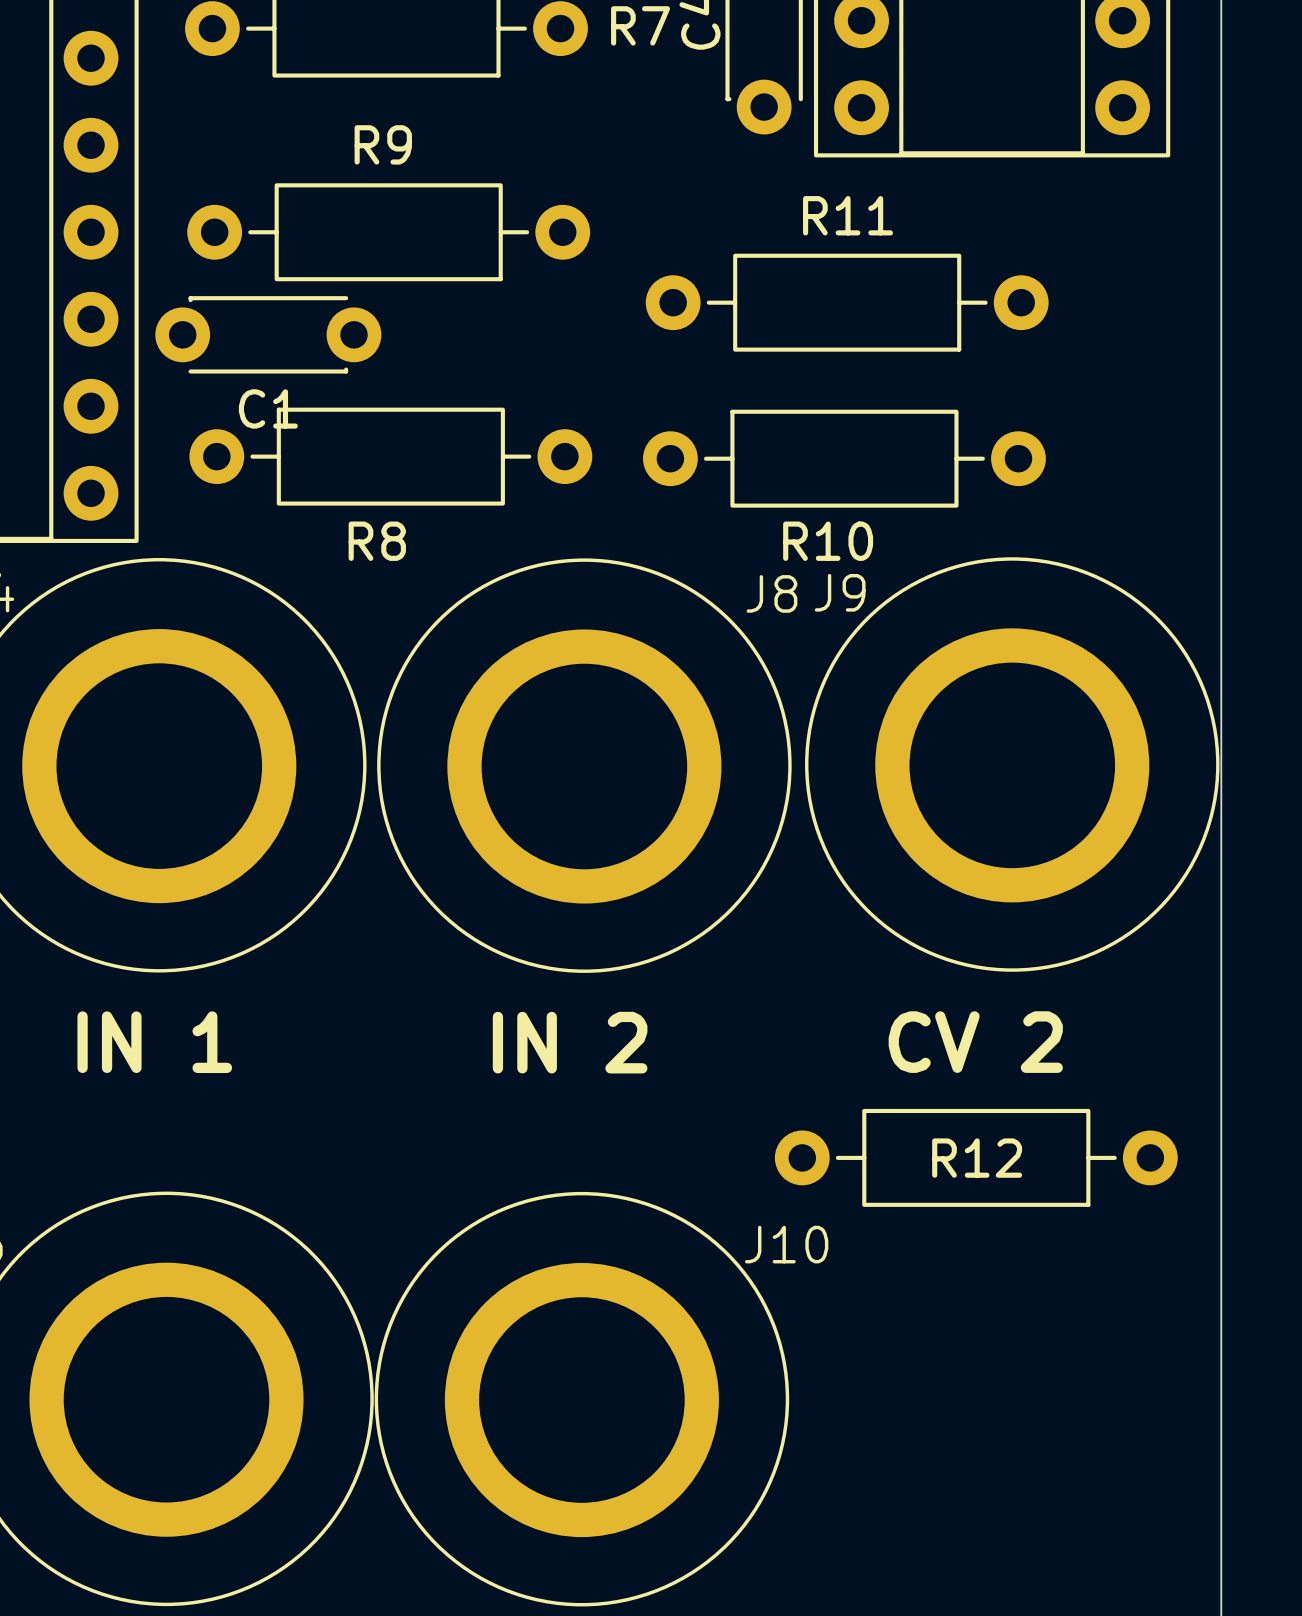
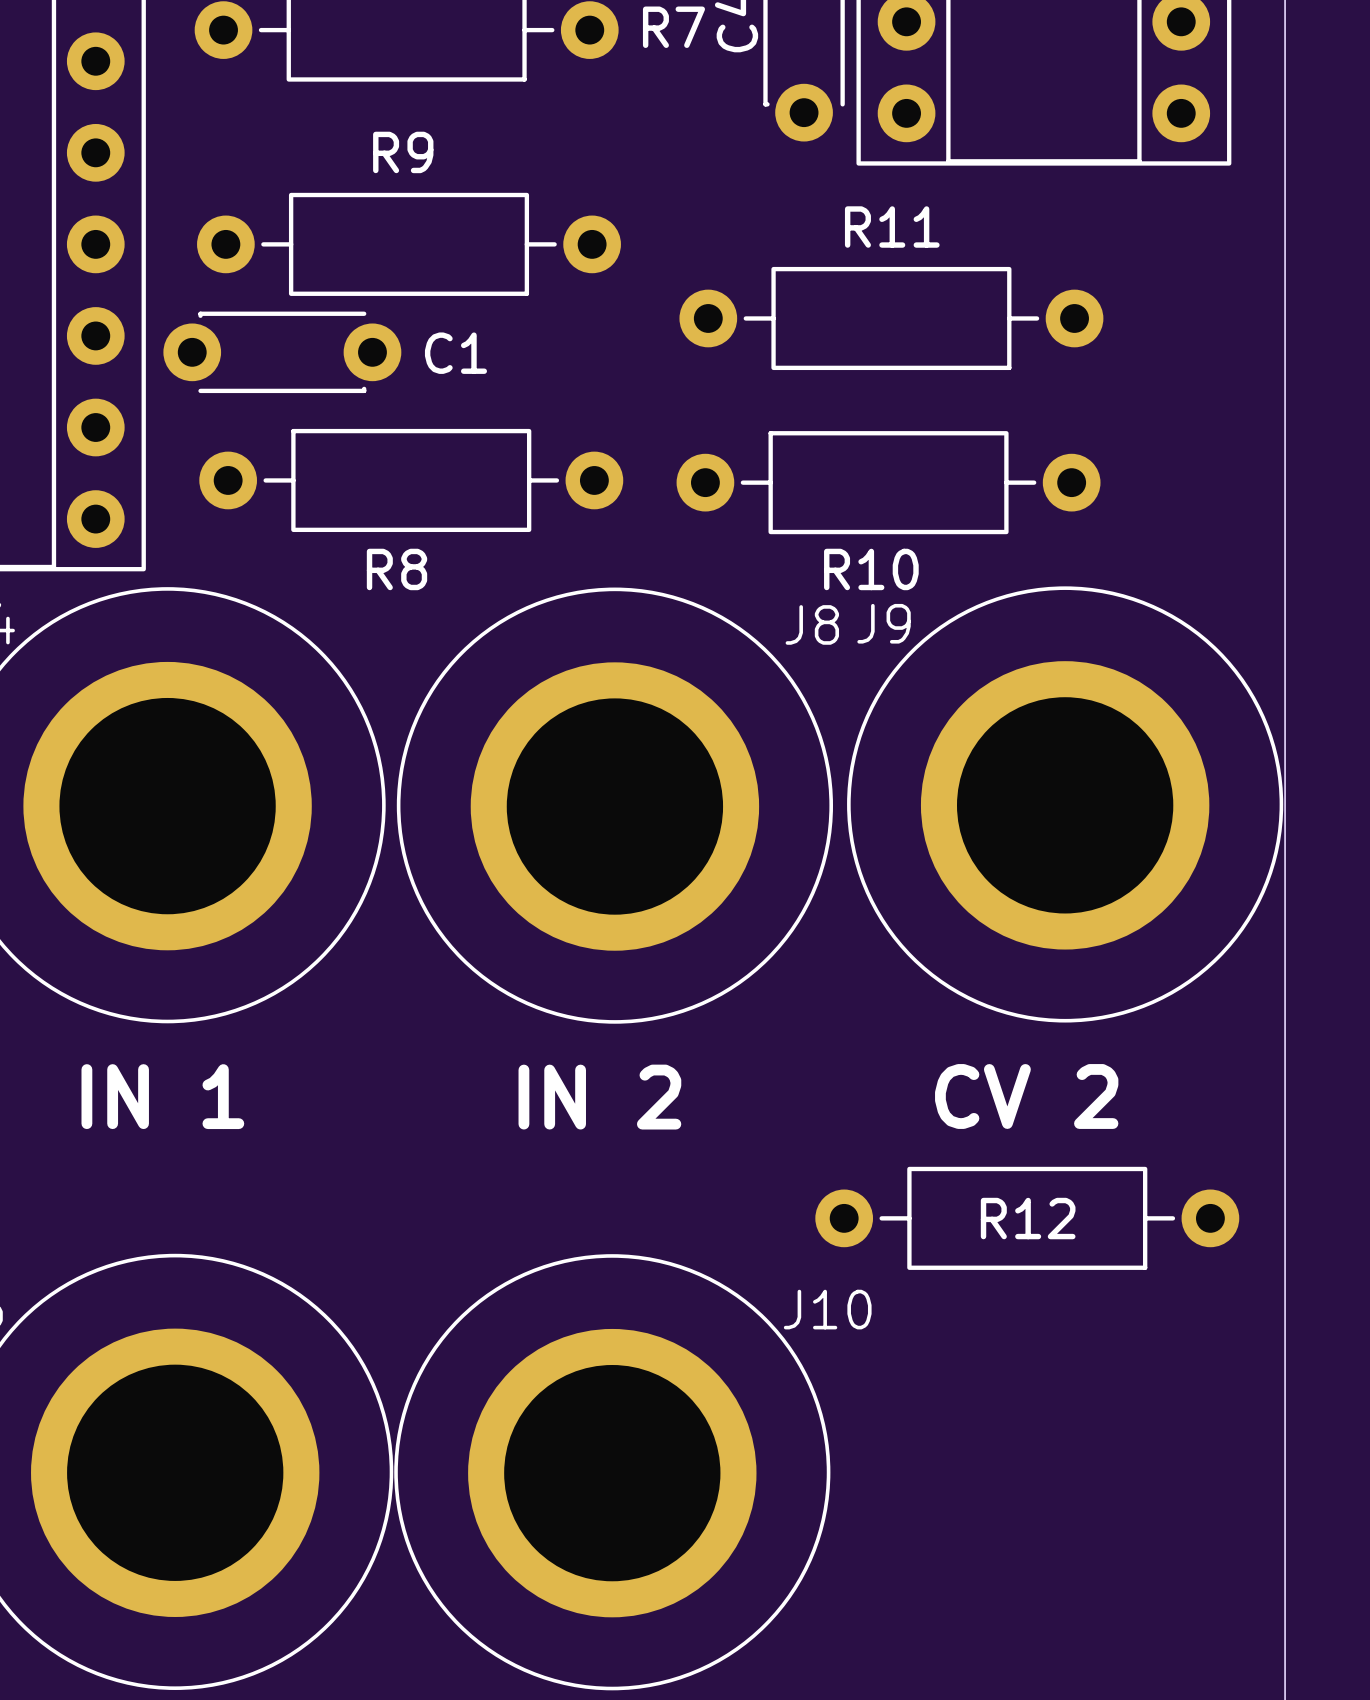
C1 name position: C1 (268, 408) -> C1 (455, 353)

